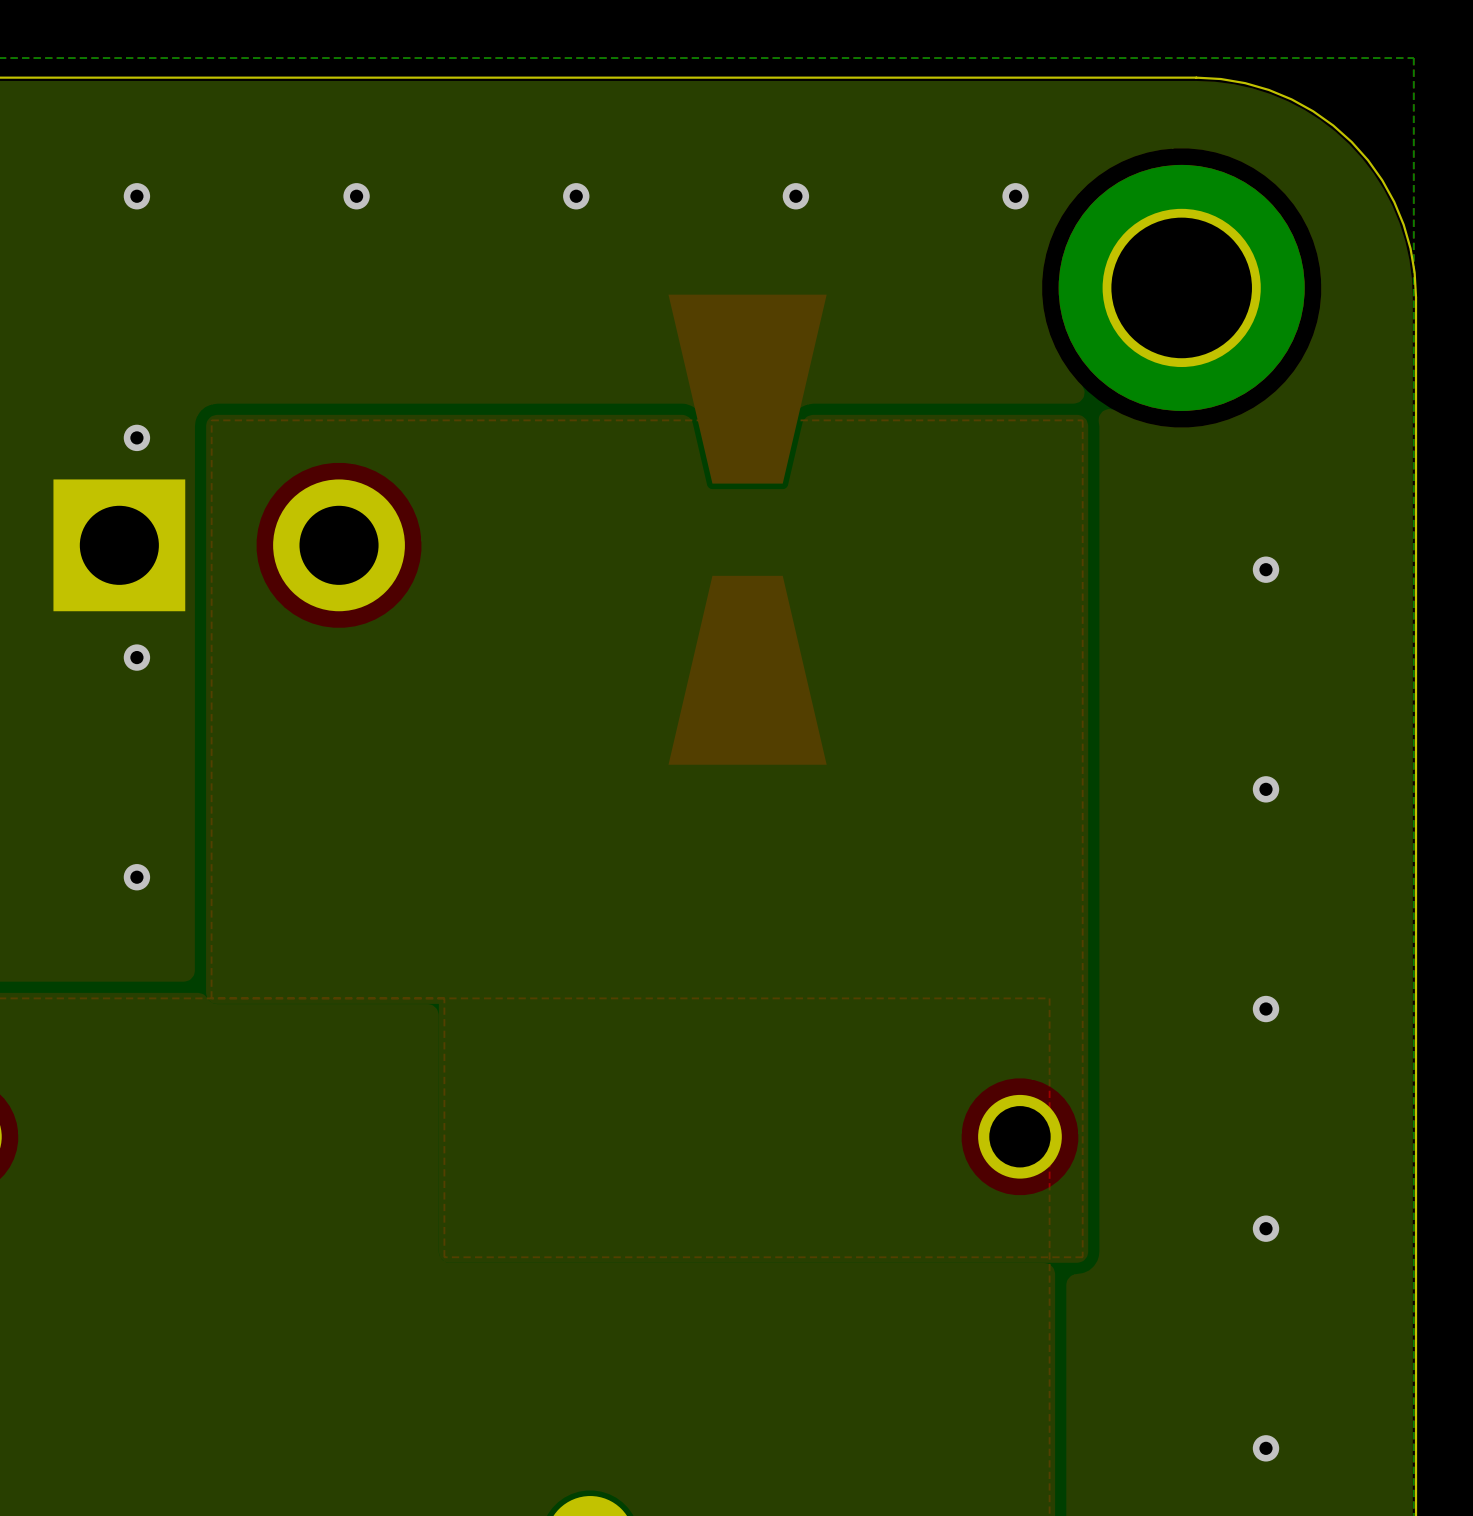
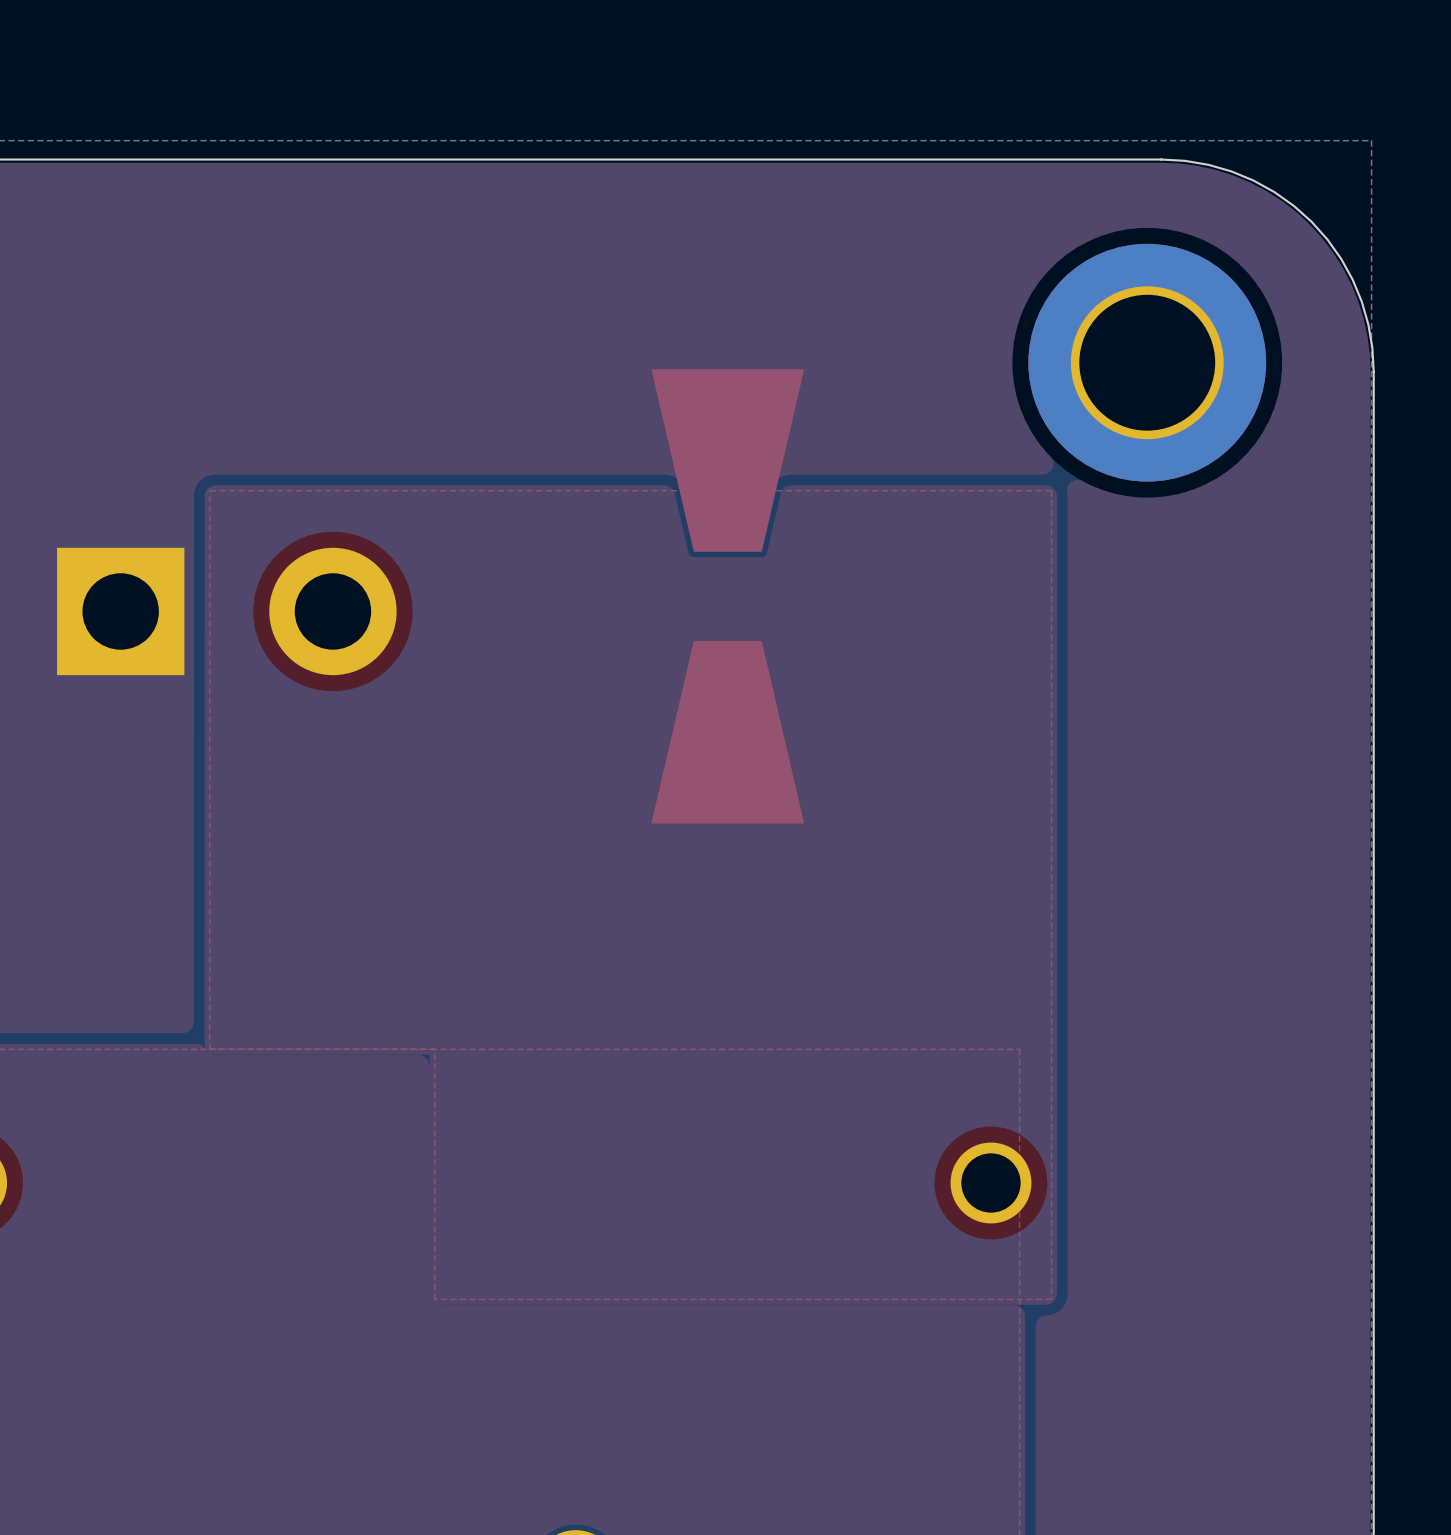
via: (136, 196) -> none
via: (356, 196) -> none
via: (576, 196) -> none
via: (795, 196) -> none
via: (1015, 196) -> none
via: (136, 437) -> none
via: (1266, 569) -> none
via: (136, 657) -> none
via: (1266, 789) -> none
via: (136, 877) -> none
via: (1266, 1009) -> none
via: (1266, 1228) -> none
via: (1266, 1448) -> none

